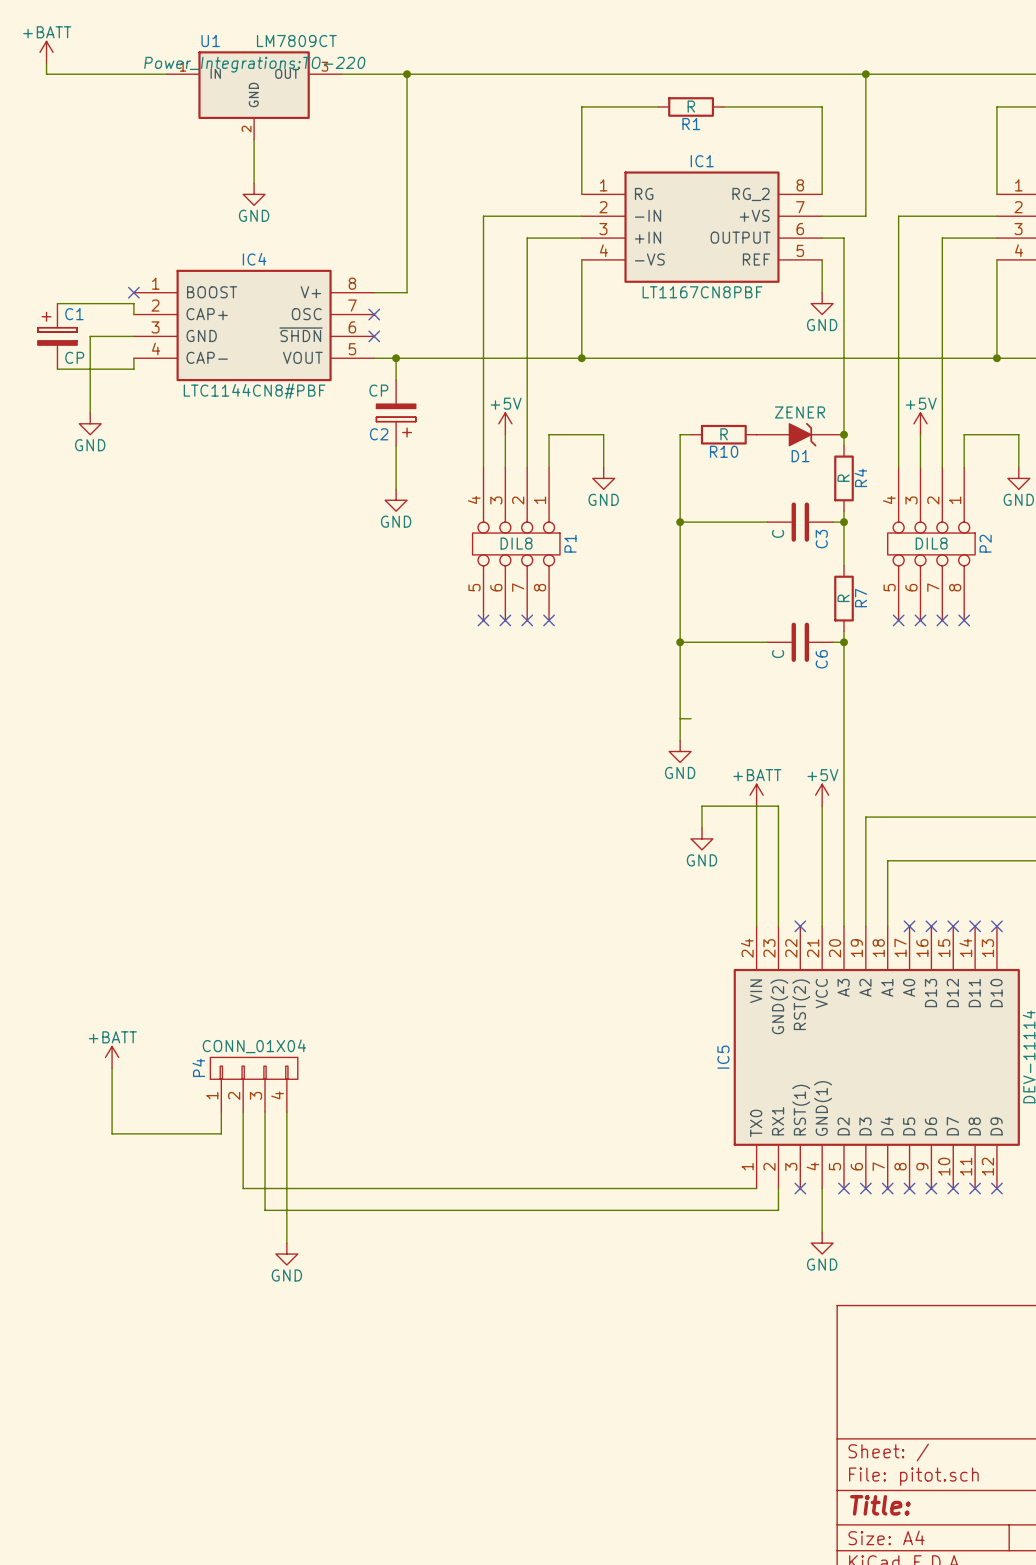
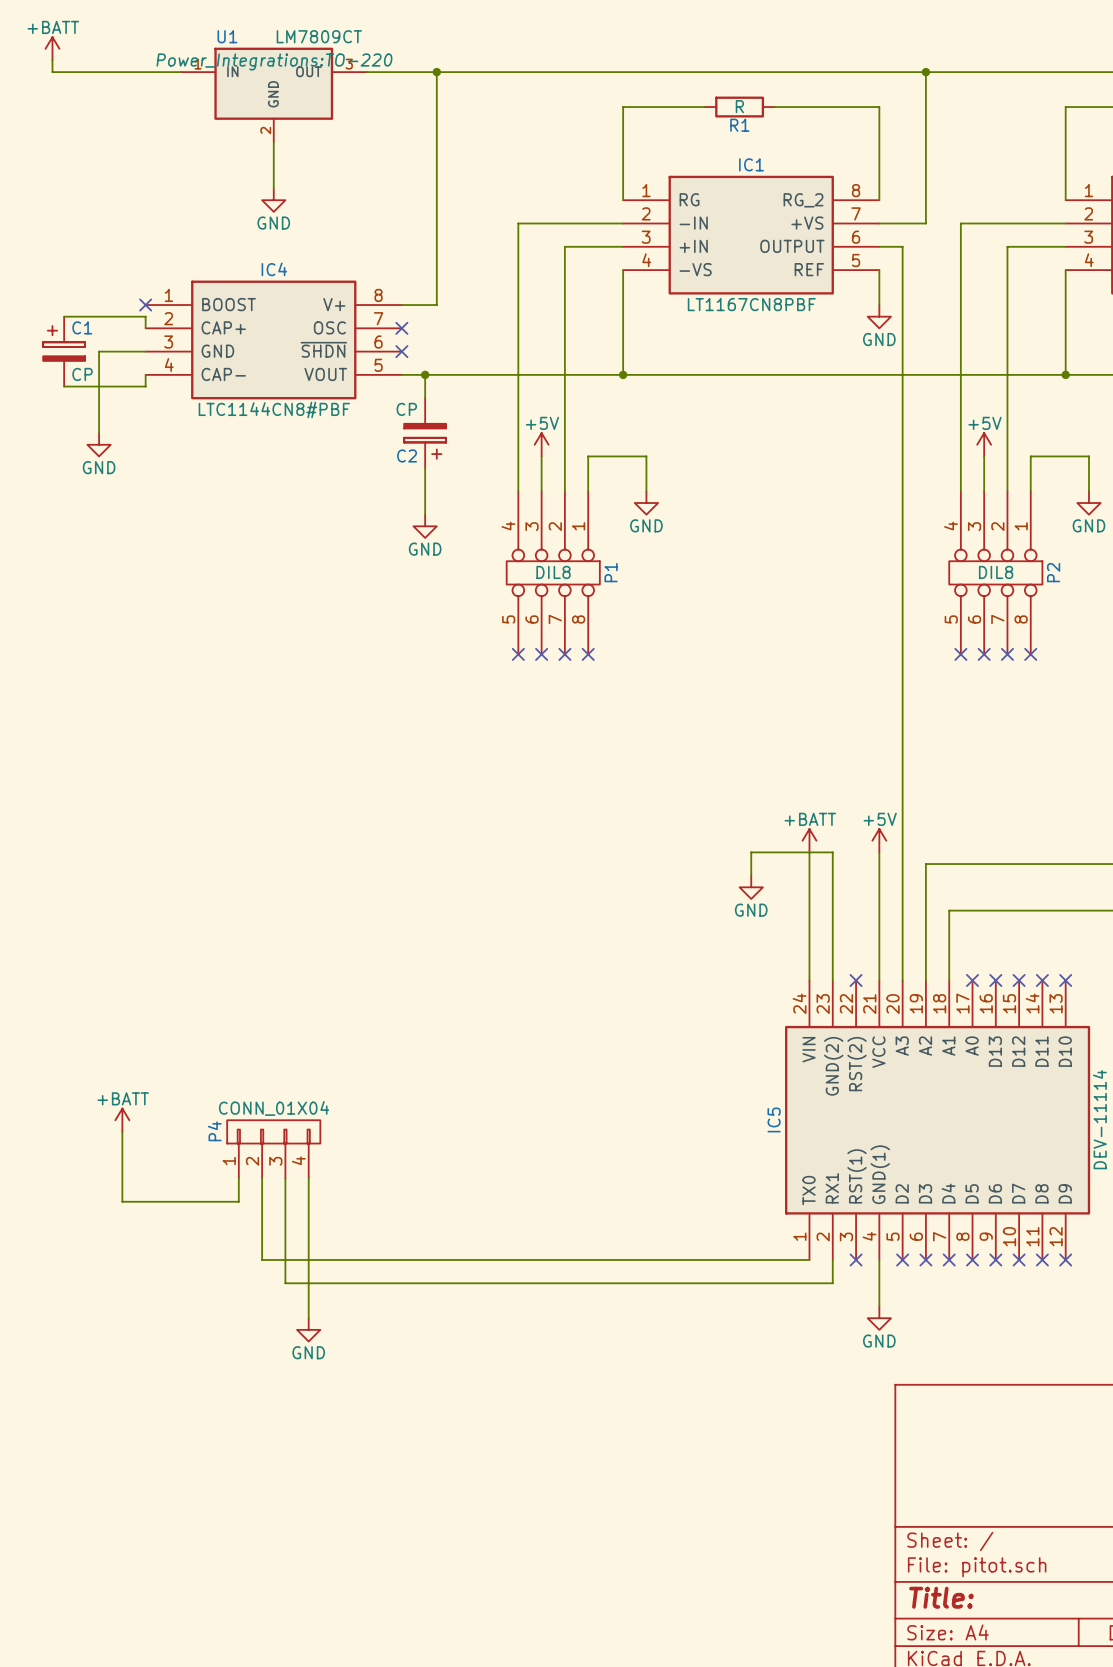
wire: (691, 434) (680, 434) (680, 740) -> none
R10: R (723, 434) -> none
D1: ZENER (800, 434) -> none
junction: (844, 434) -> none
wire: none -> (902, 468) (902, 537)
R4: R (844, 478) -> none
wire: (680, 522) (767, 522) -> none
junction: (680, 522) -> none
C3: C (800, 522) -> none
wire: (833, 522) (844, 522) -> none
junction: (844, 522) -> none
wire: none -> (902, 596) (902, 666)
R7: R (844, 598) -> none
wire: (680, 642) (767, 642) -> none
junction: (680, 642) -> none
C6: C (800, 642) -> none
wire: (833, 642) (844, 642) -> none
junction: (844, 642) -> none
wire: (680, 718) (691, 718) -> none
power symbol: GND (680, 751) -> none

